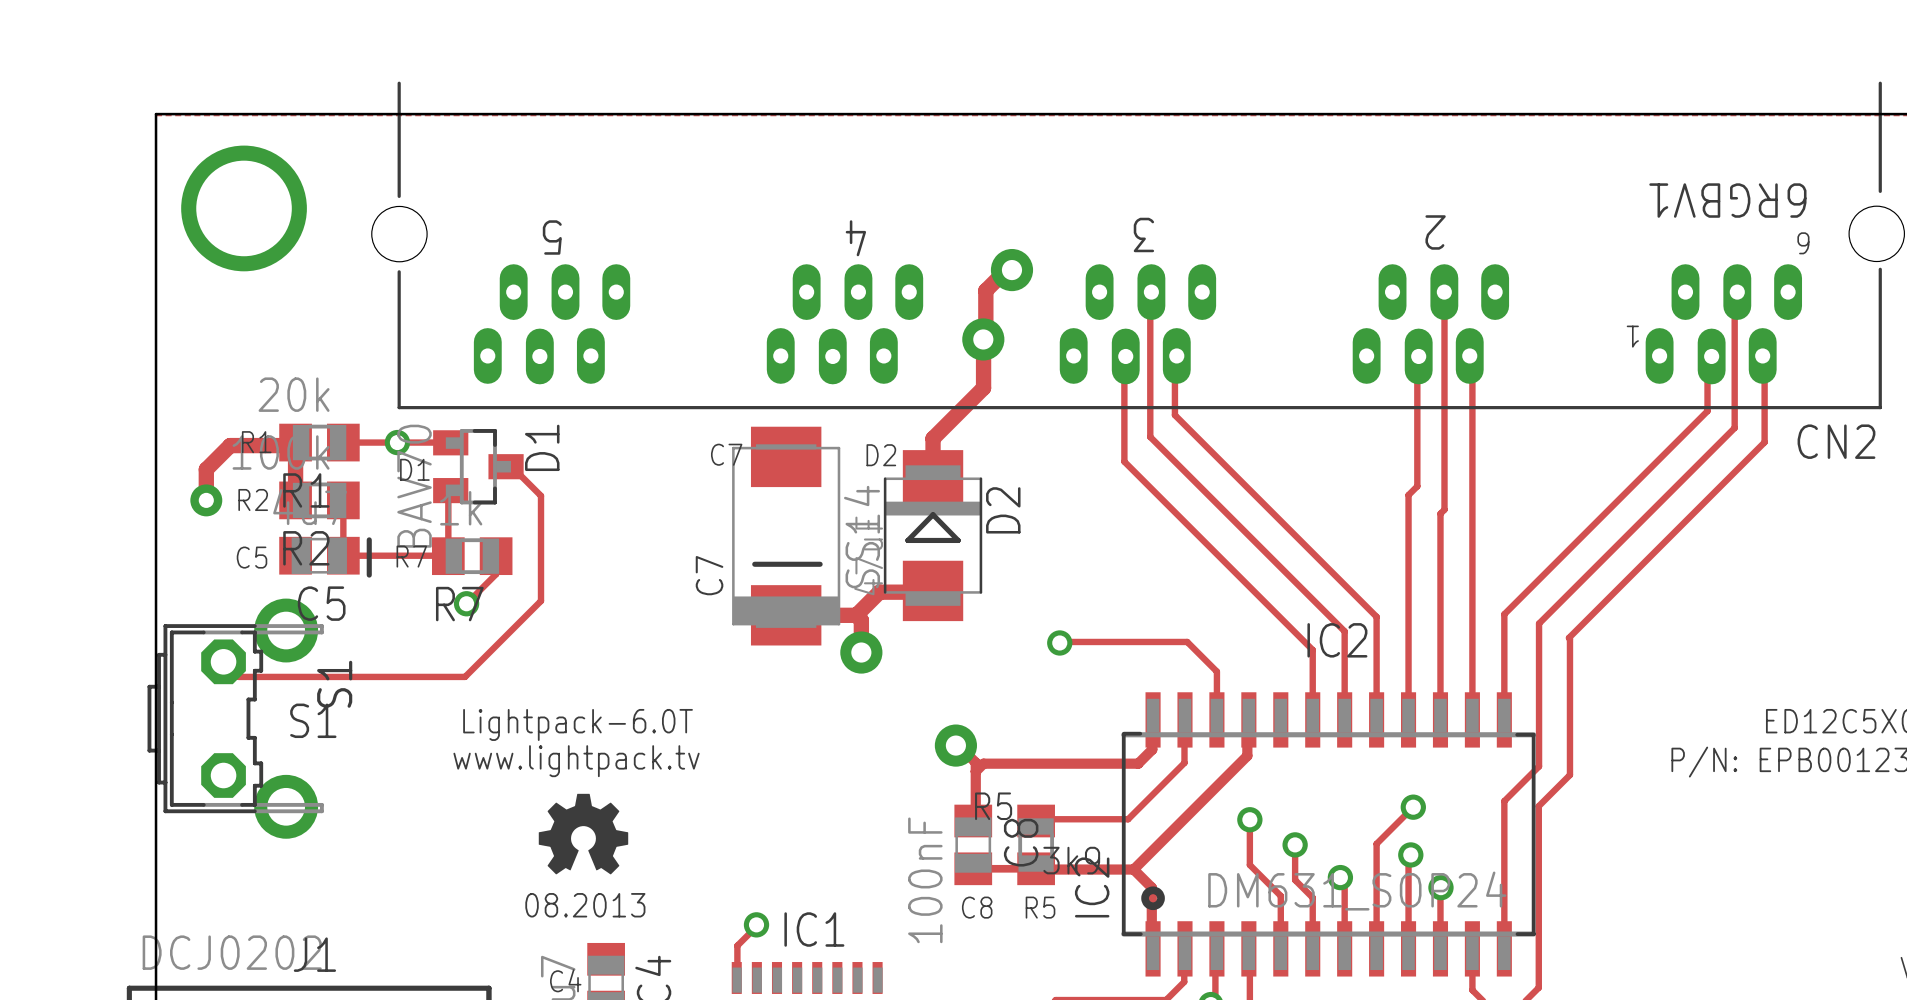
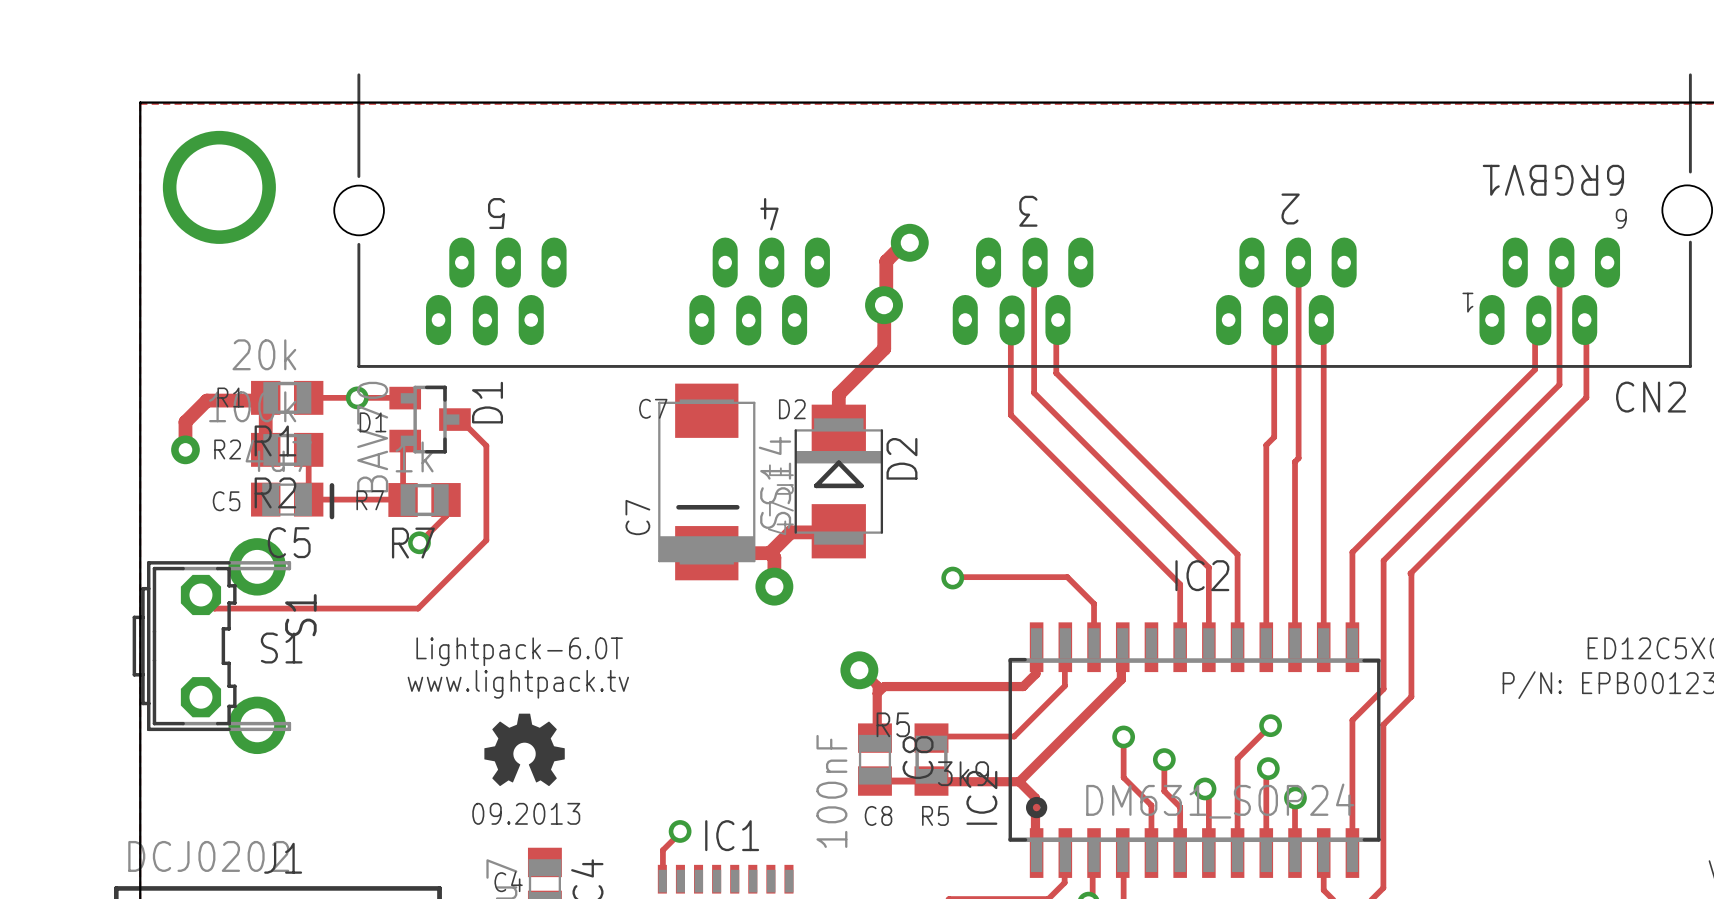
text: 08.2013 (585, 905) -> 09.2013 (526, 813)

